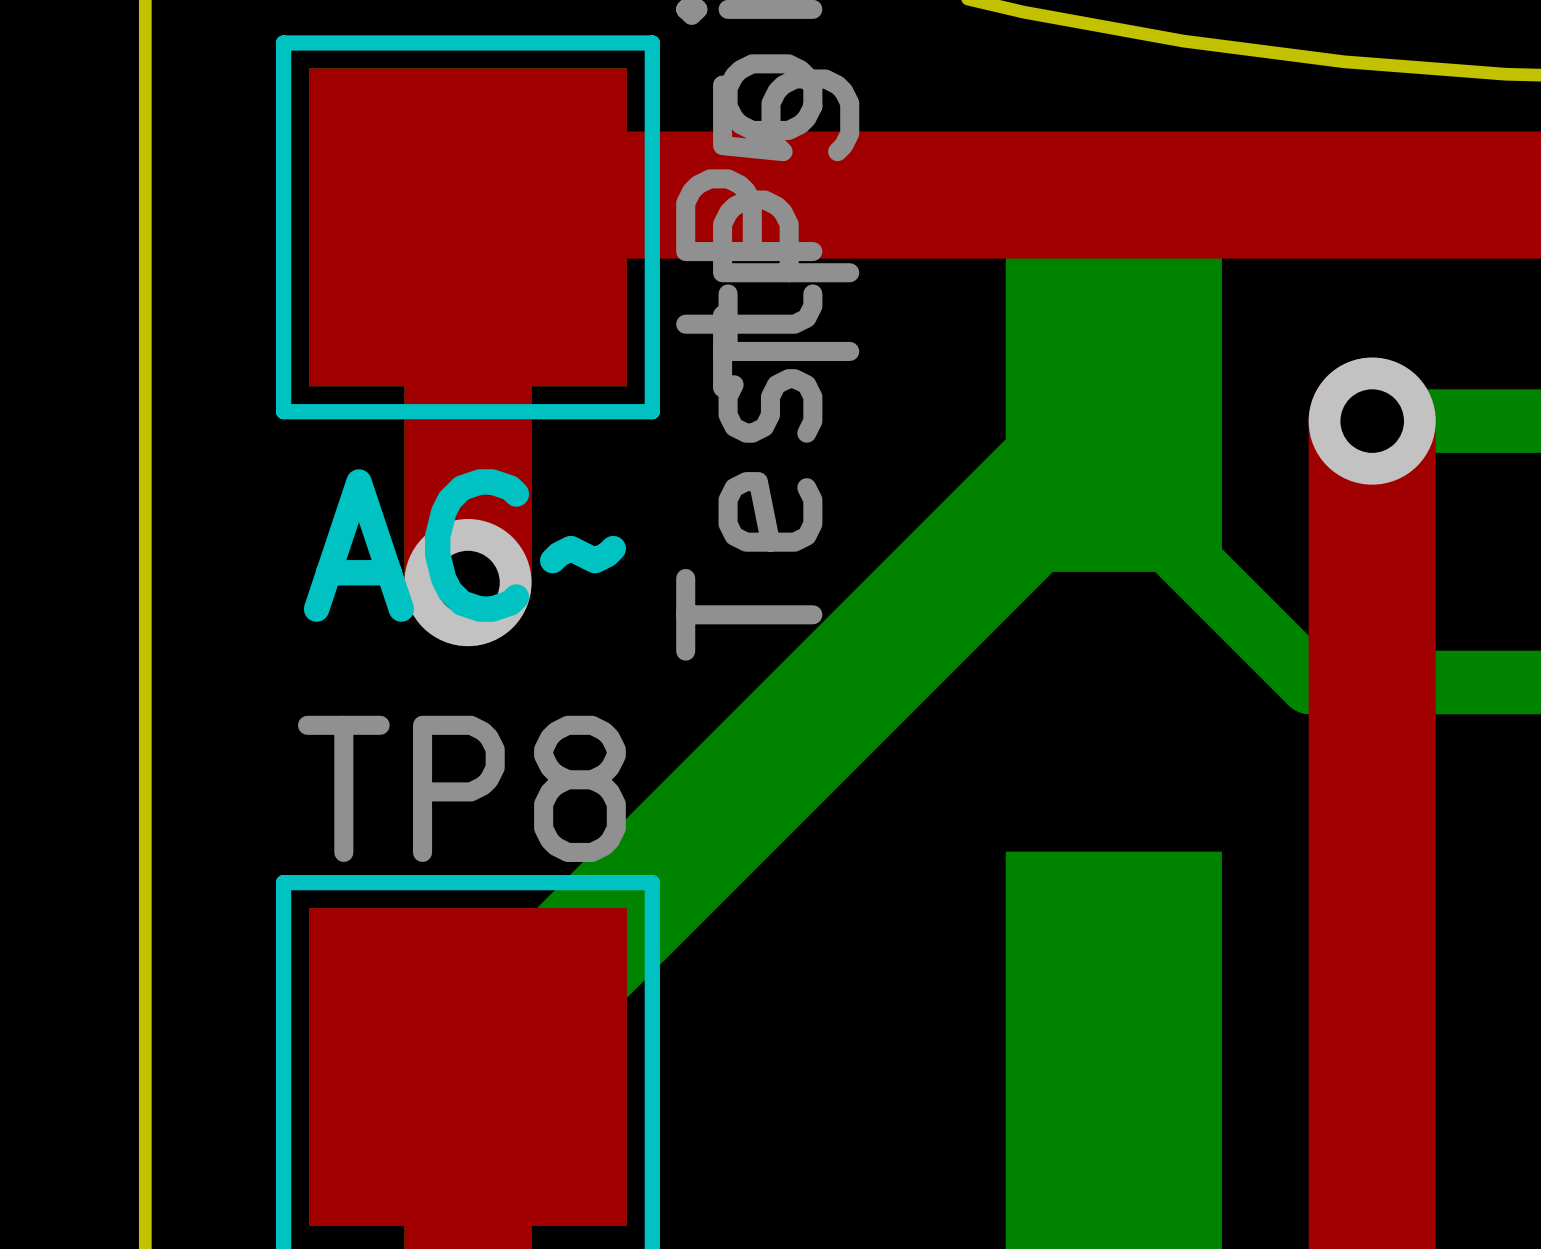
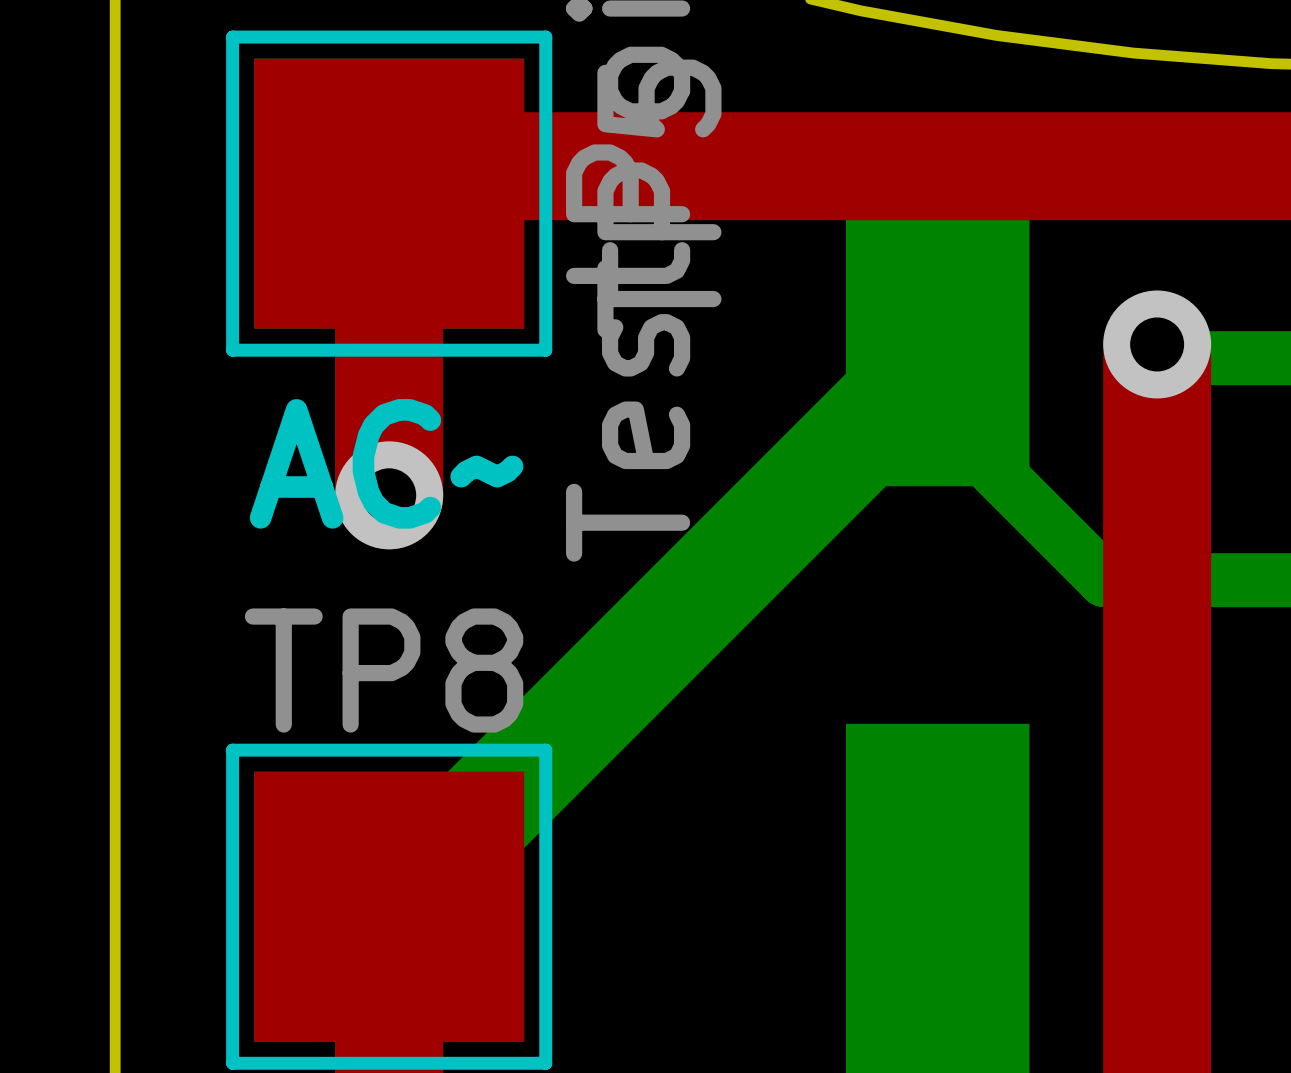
via position: (1372, 421) -> (1157, 344)

